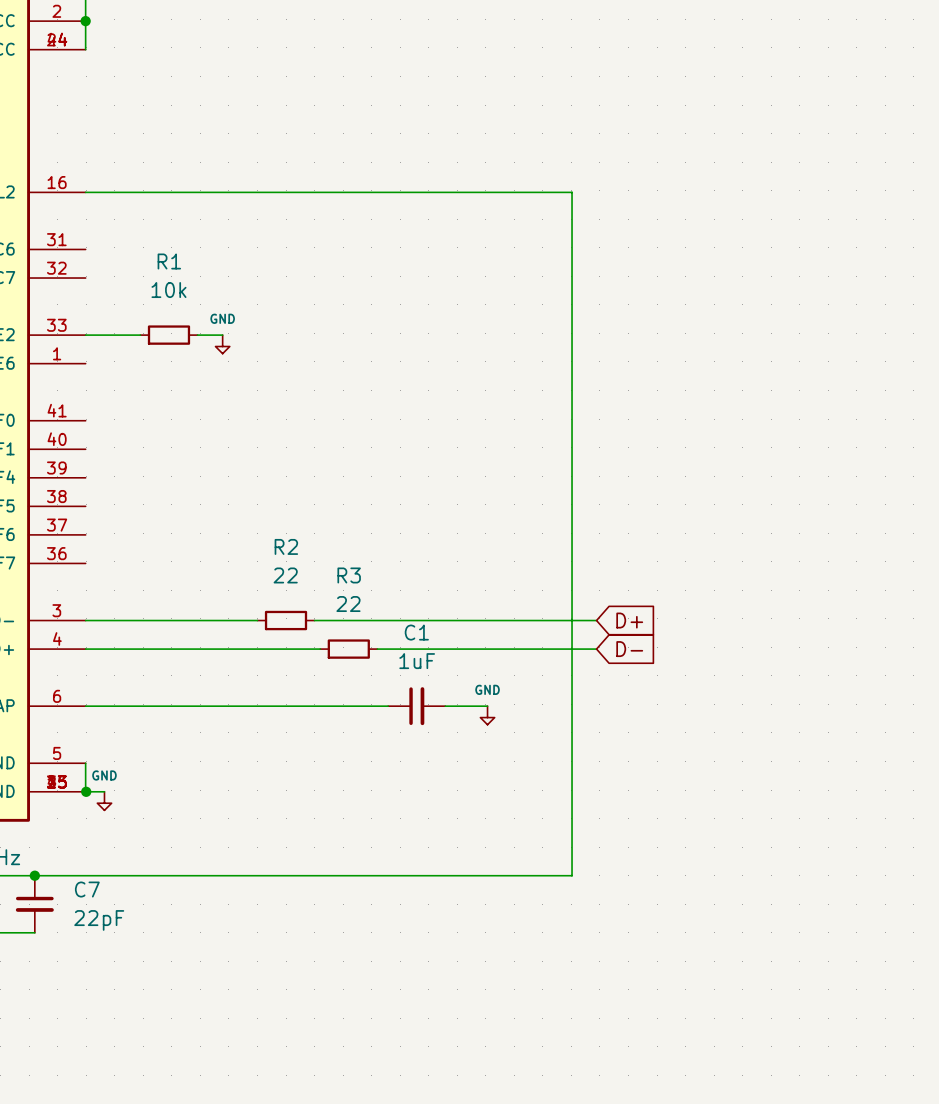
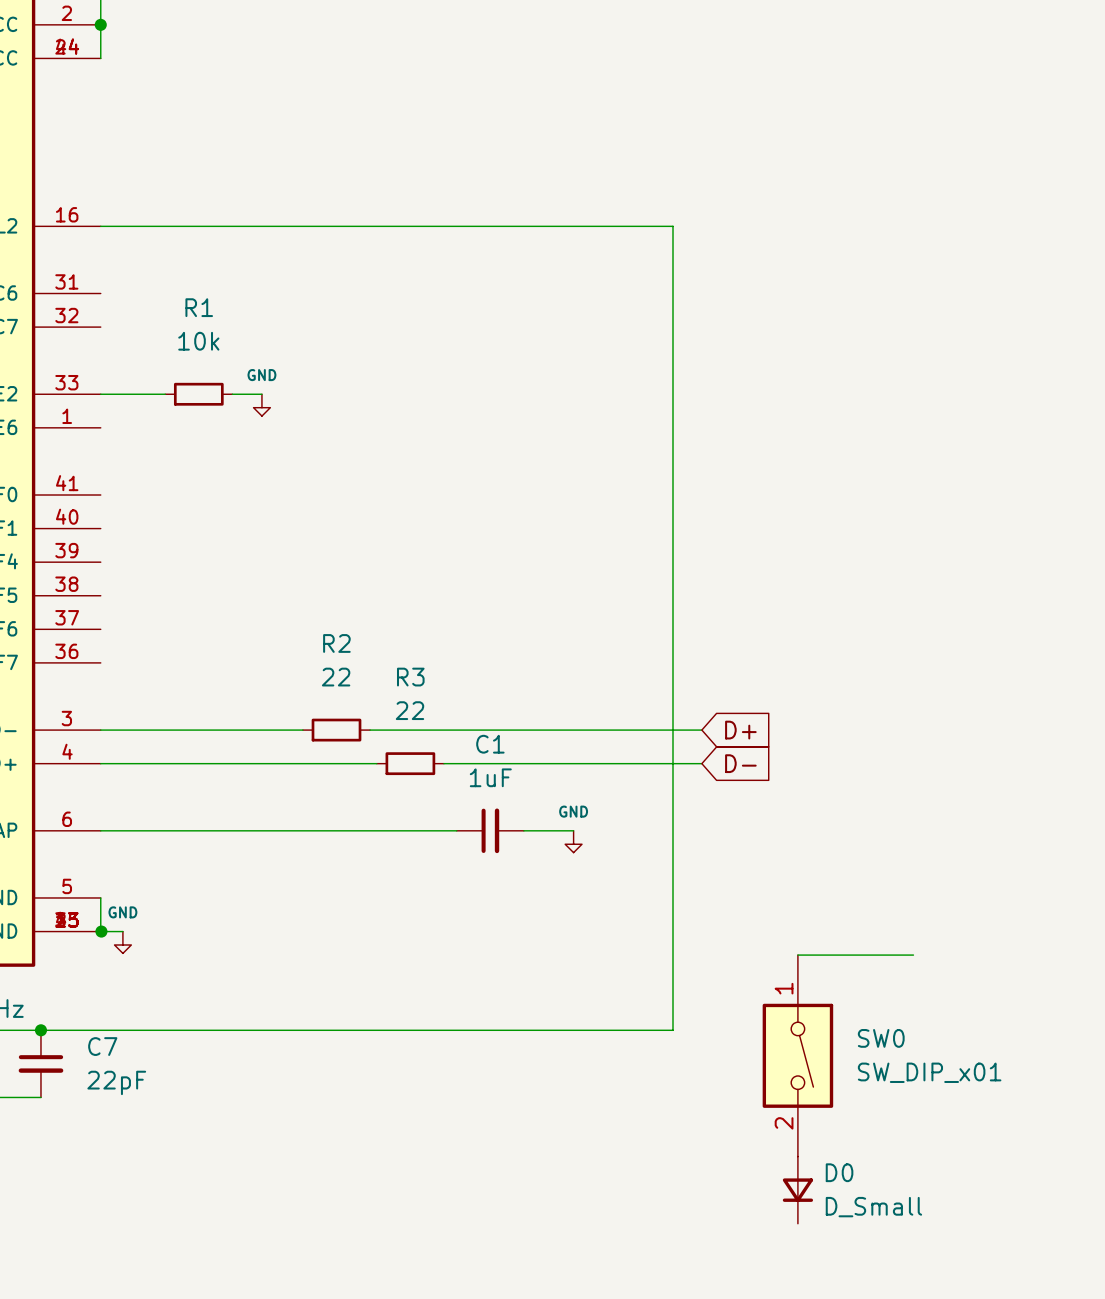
wire: none -> (797, 955) (913, 955)
SW0: none -> SW_DIP_x01 (797, 1055)
D0: none -> D_Small (797, 1190)

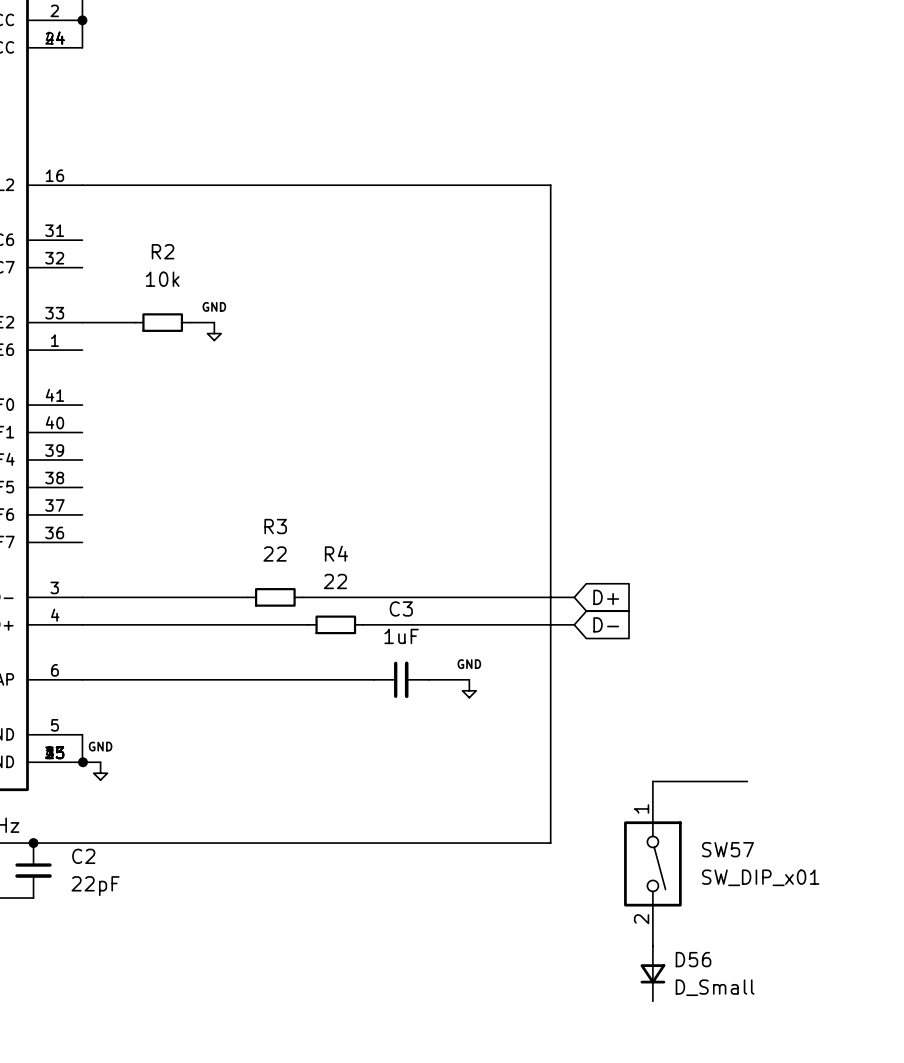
R1 name: R1 (199, 307) -> R2 (163, 251)
R2 name: R2 (336, 643) -> R3 (275, 526)
R3 name: R3 (410, 677) -> R4 (336, 553)
C1 name: C1 (490, 744) -> C3 (401, 608)
SW0 name: SW0 (881, 1038) -> SW57 (727, 849)
C7 name: C7 (102, 1046) -> C2 (83, 856)
D0 name: D0 (839, 1172) -> D56 (693, 959)

